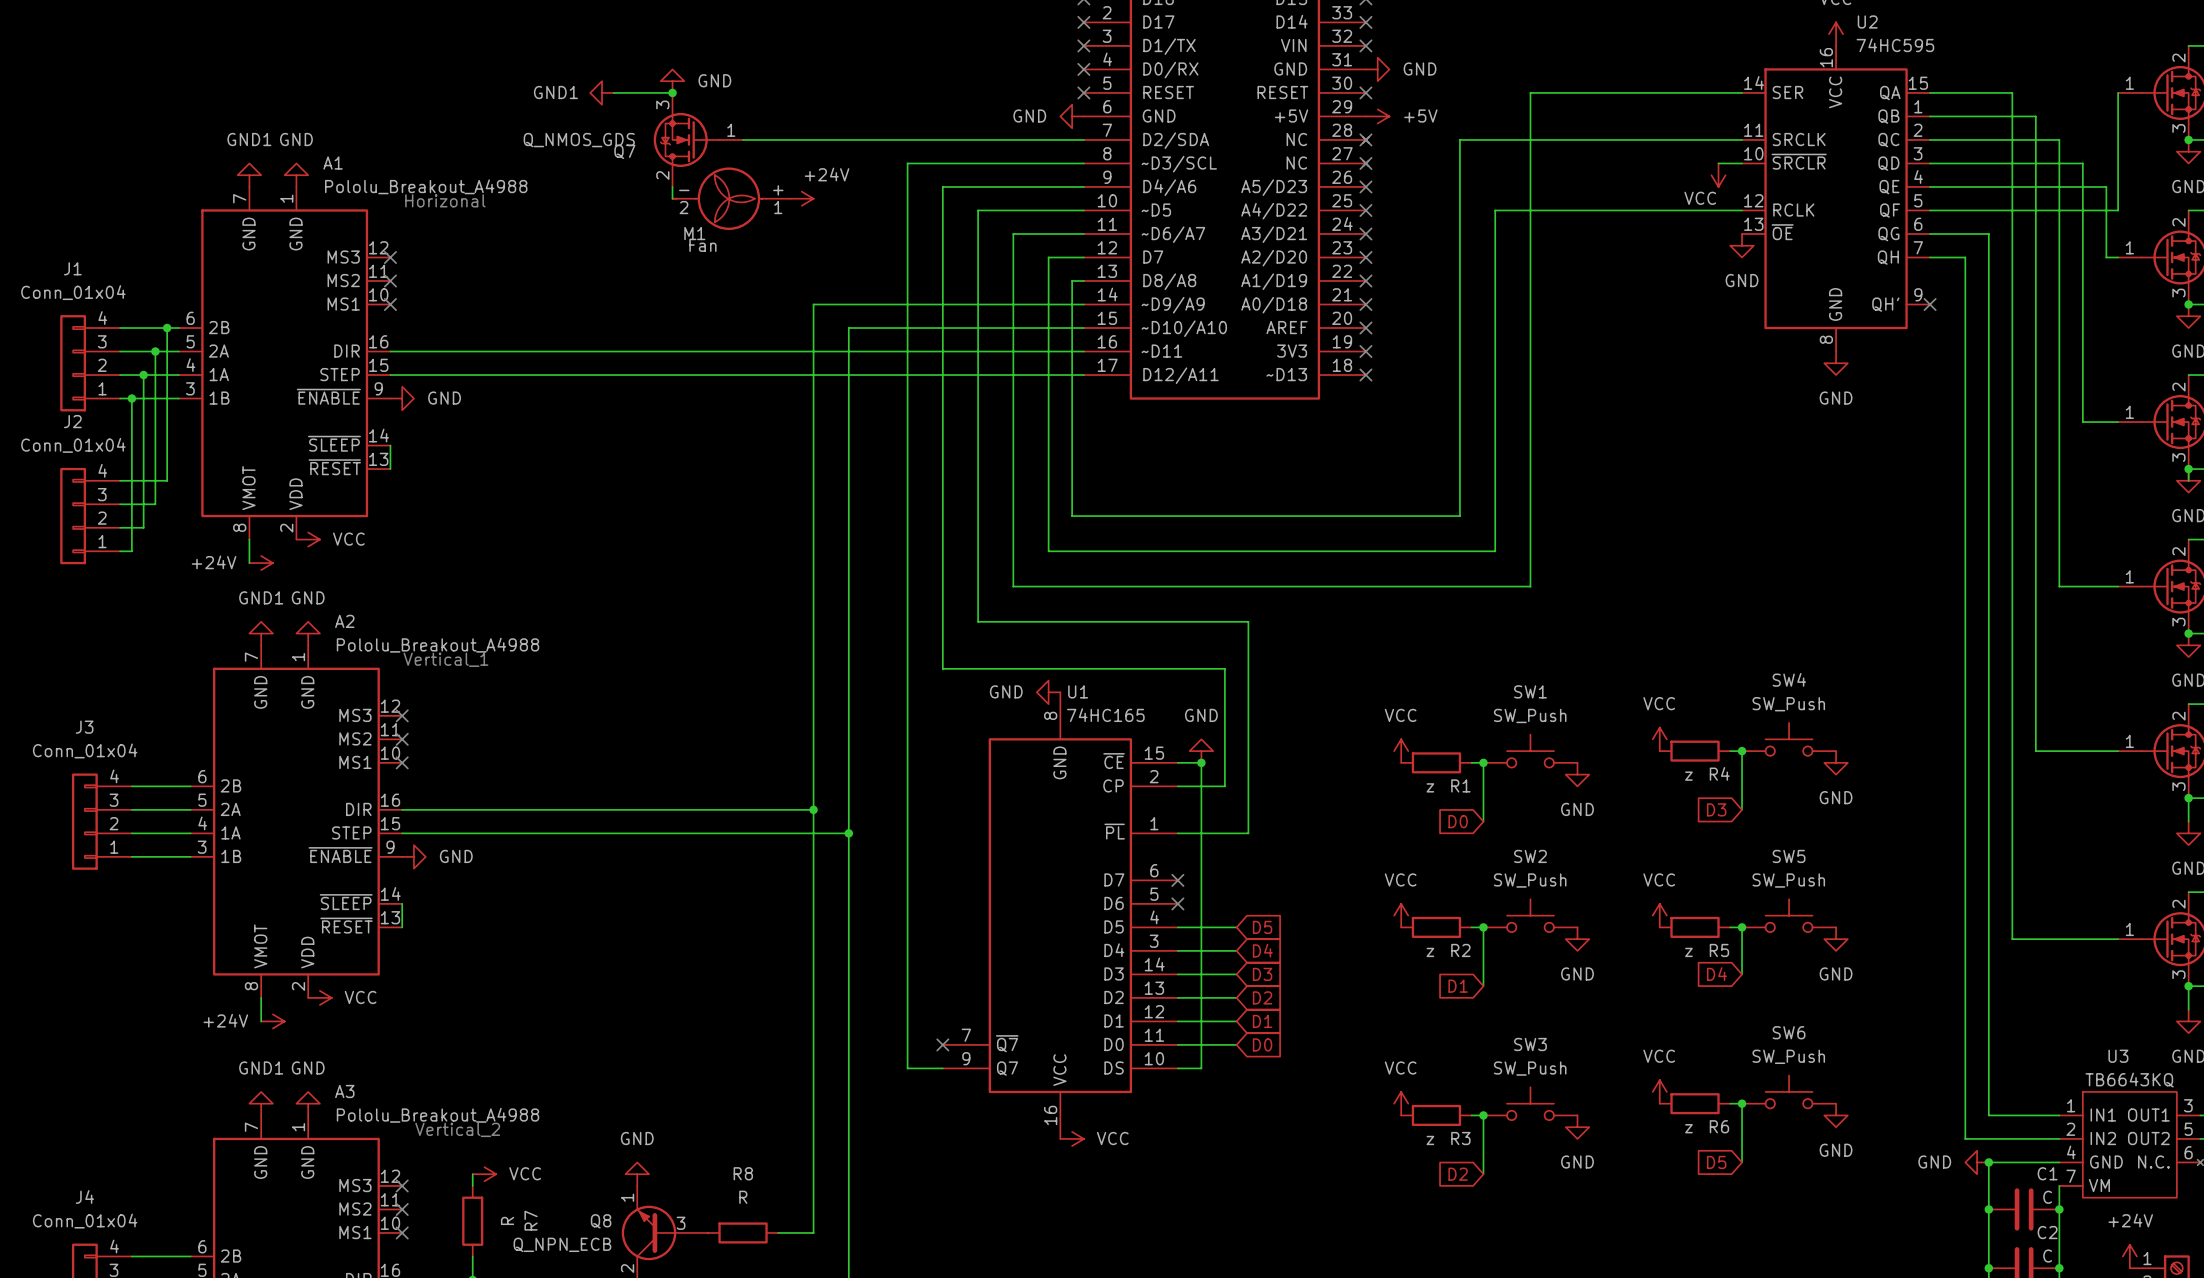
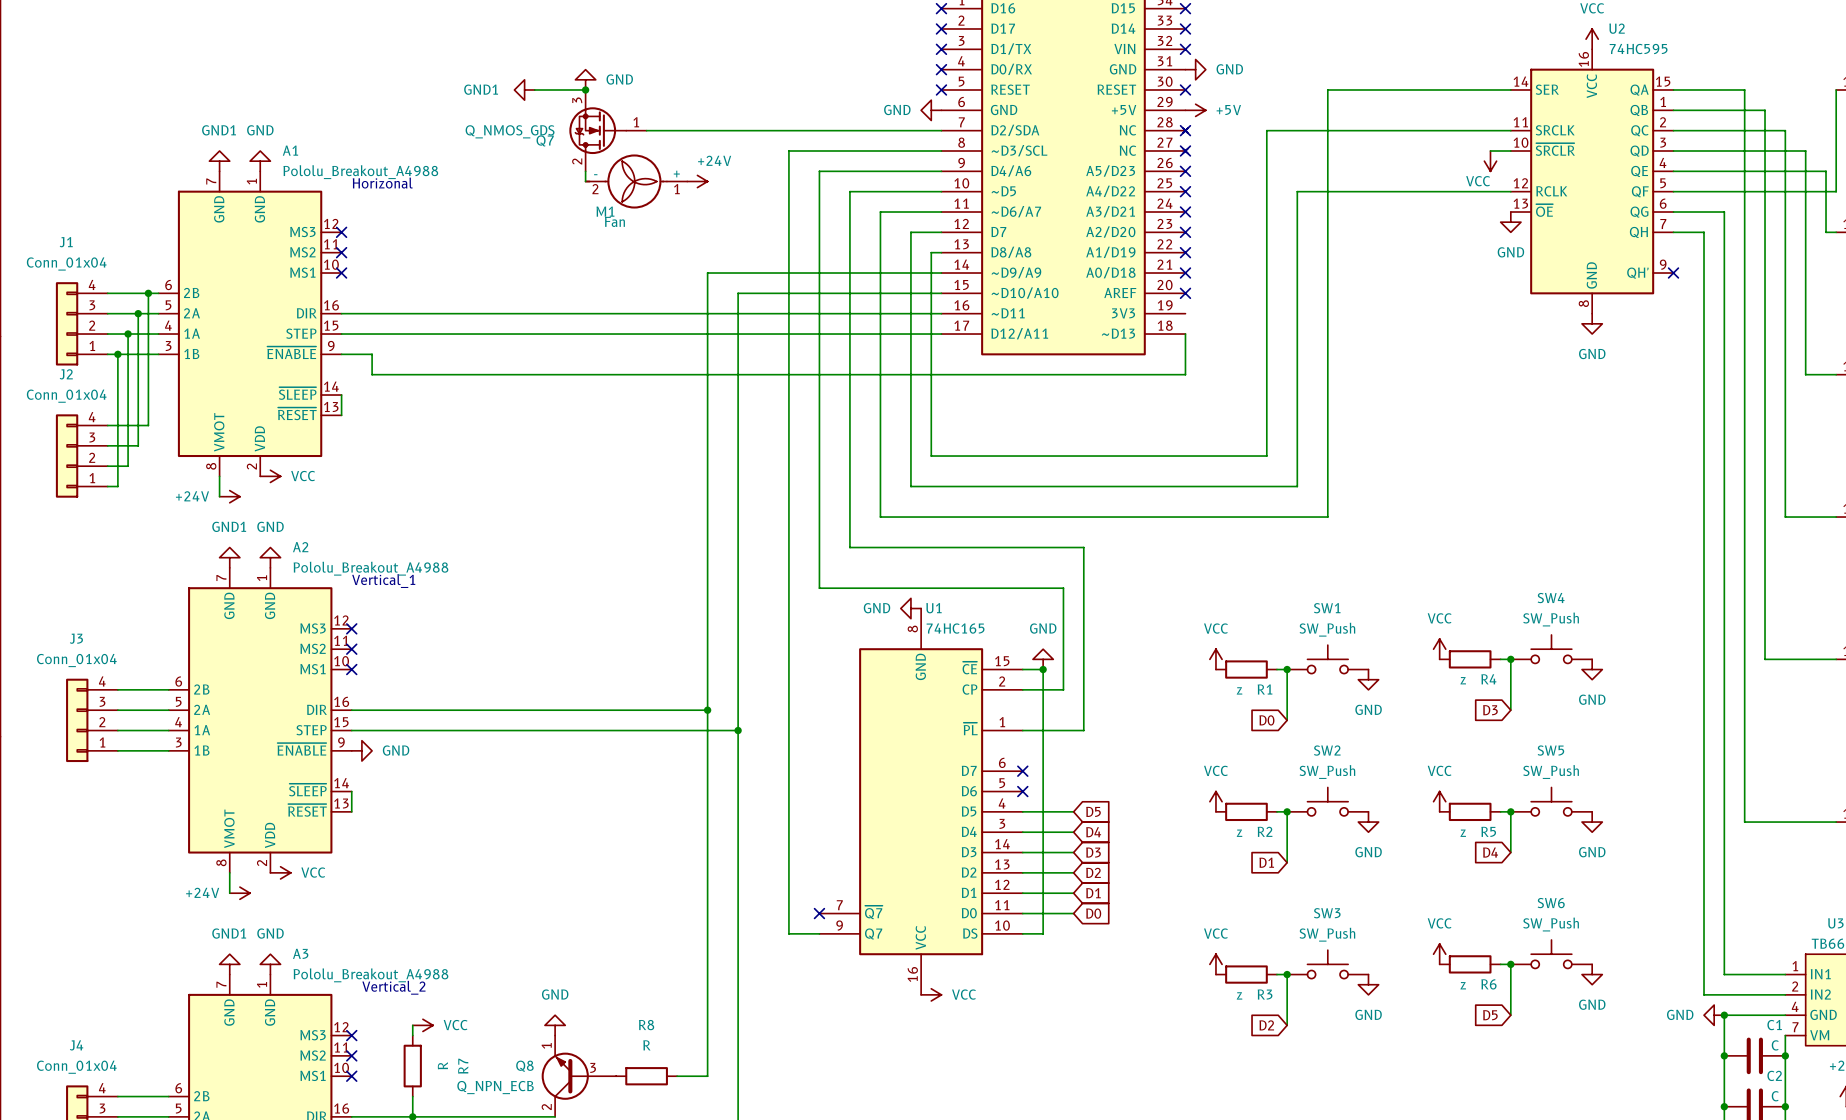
no-connect mark: (1365, 351) -> none
wire: none -> (1185, 334) (1185, 374) (372, 374) (372, 354) (341, 354)
no-connect mark: (1365, 375) -> none
power symbol: GND (402, 398) -> none

